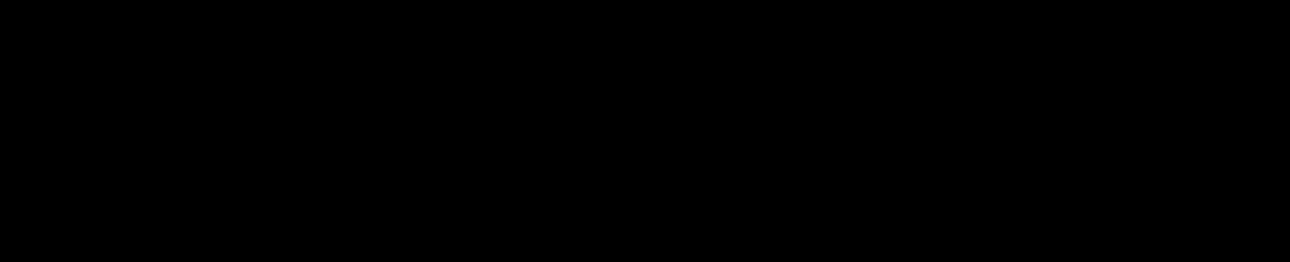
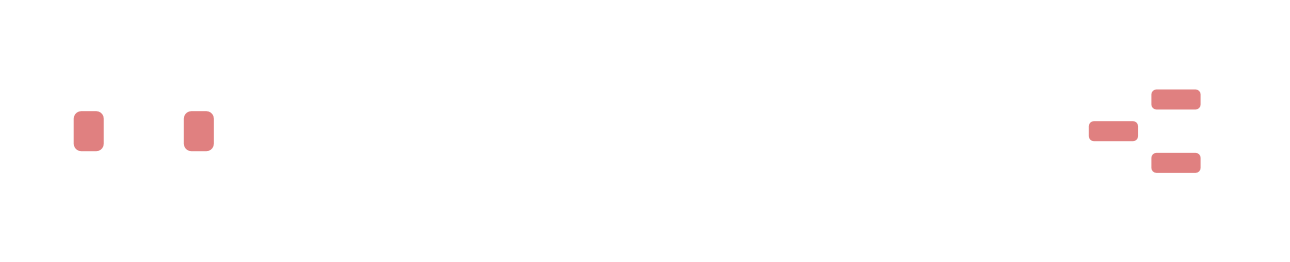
part: none -> (143, 131)
part: none -> (1144, 131)

